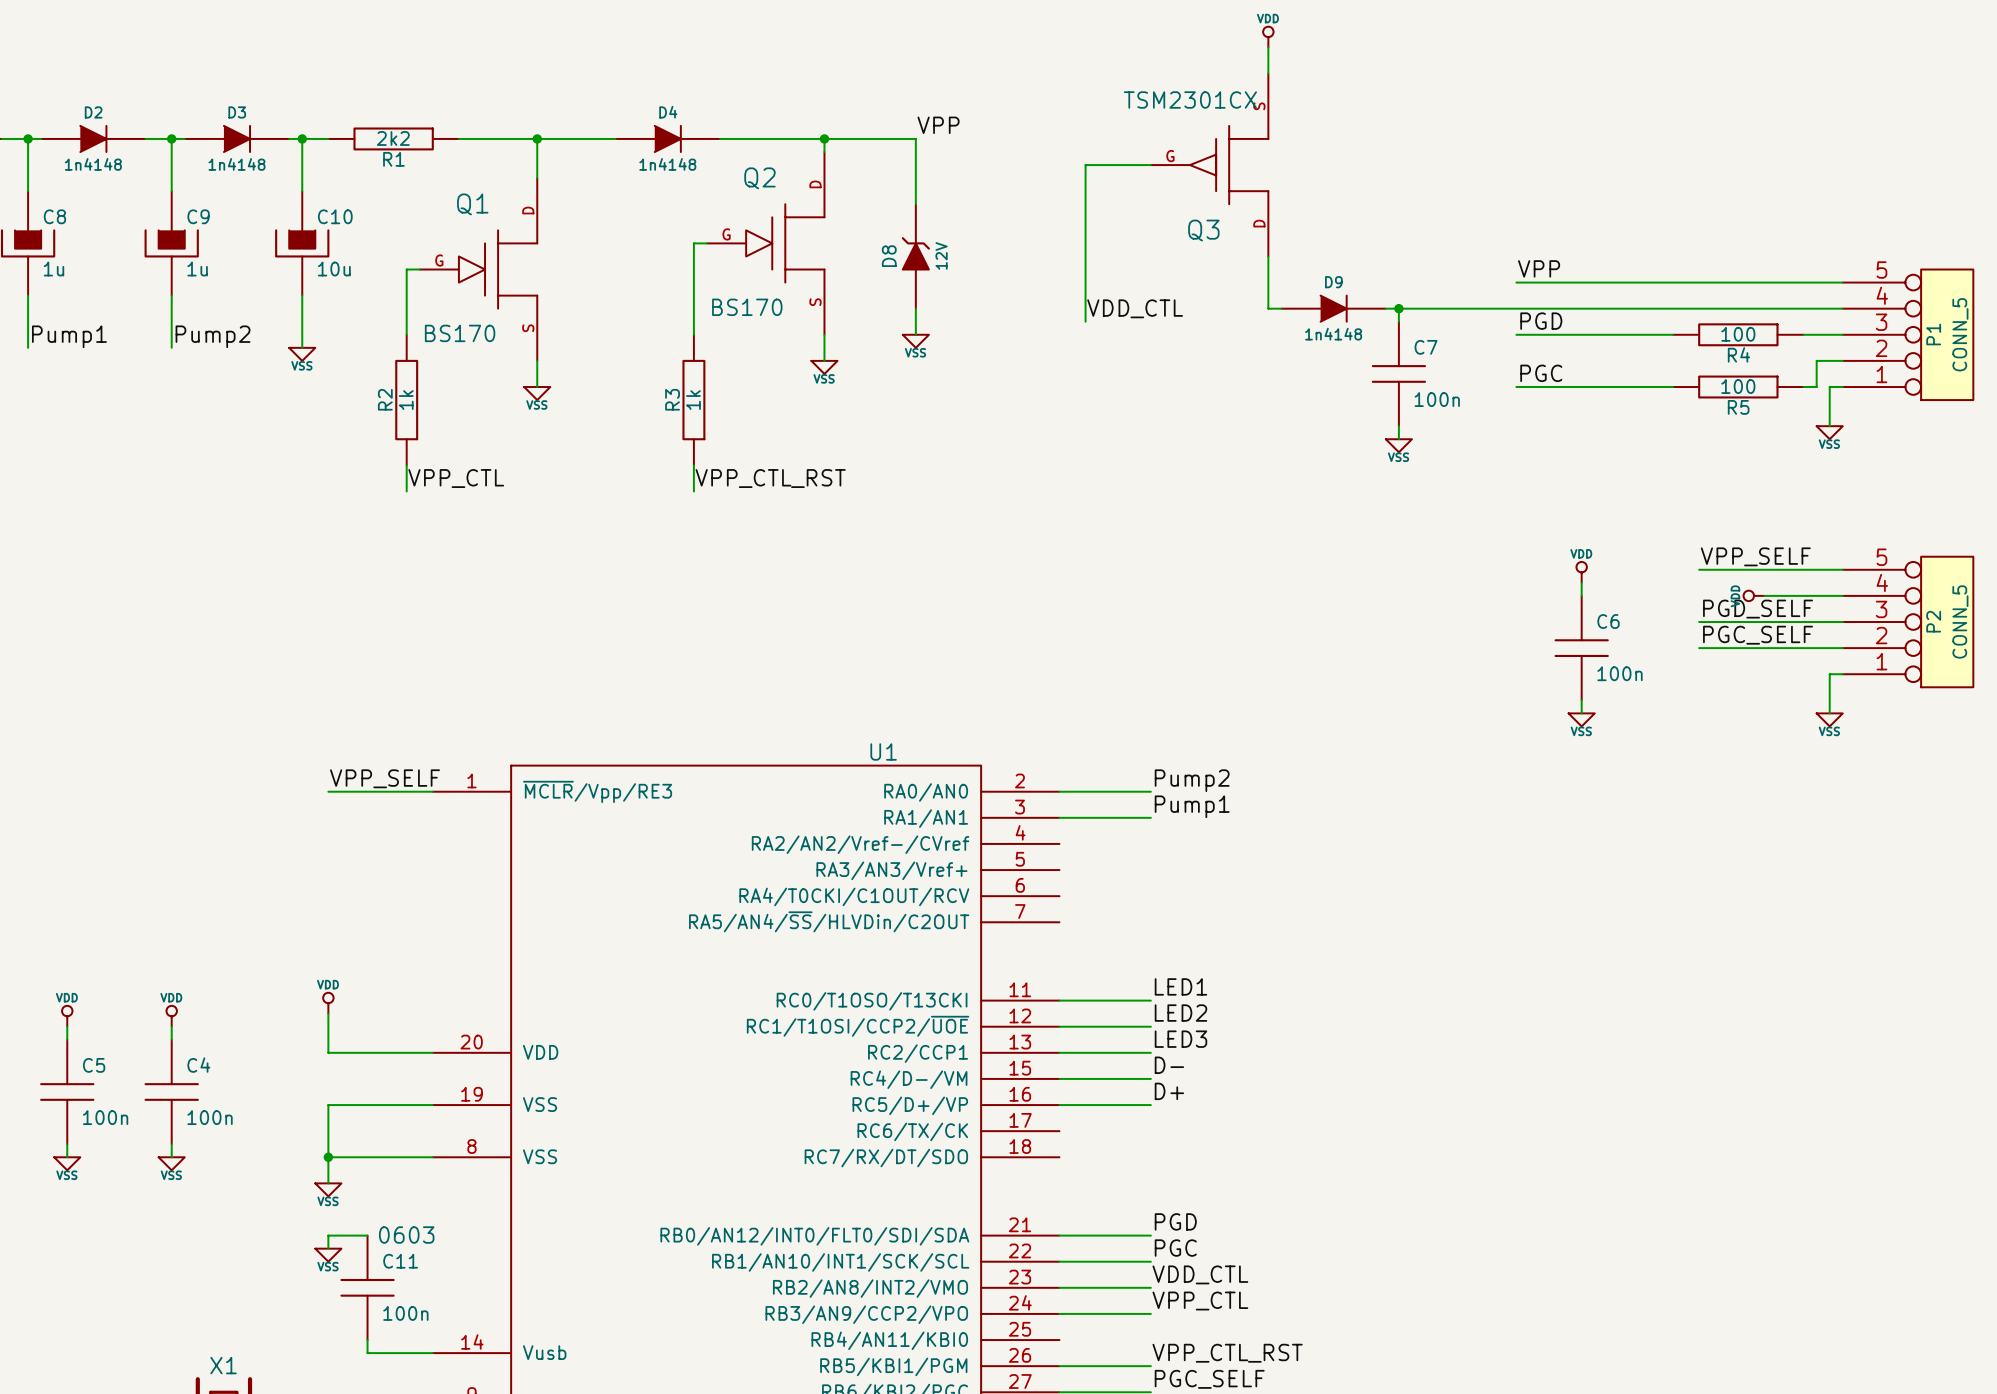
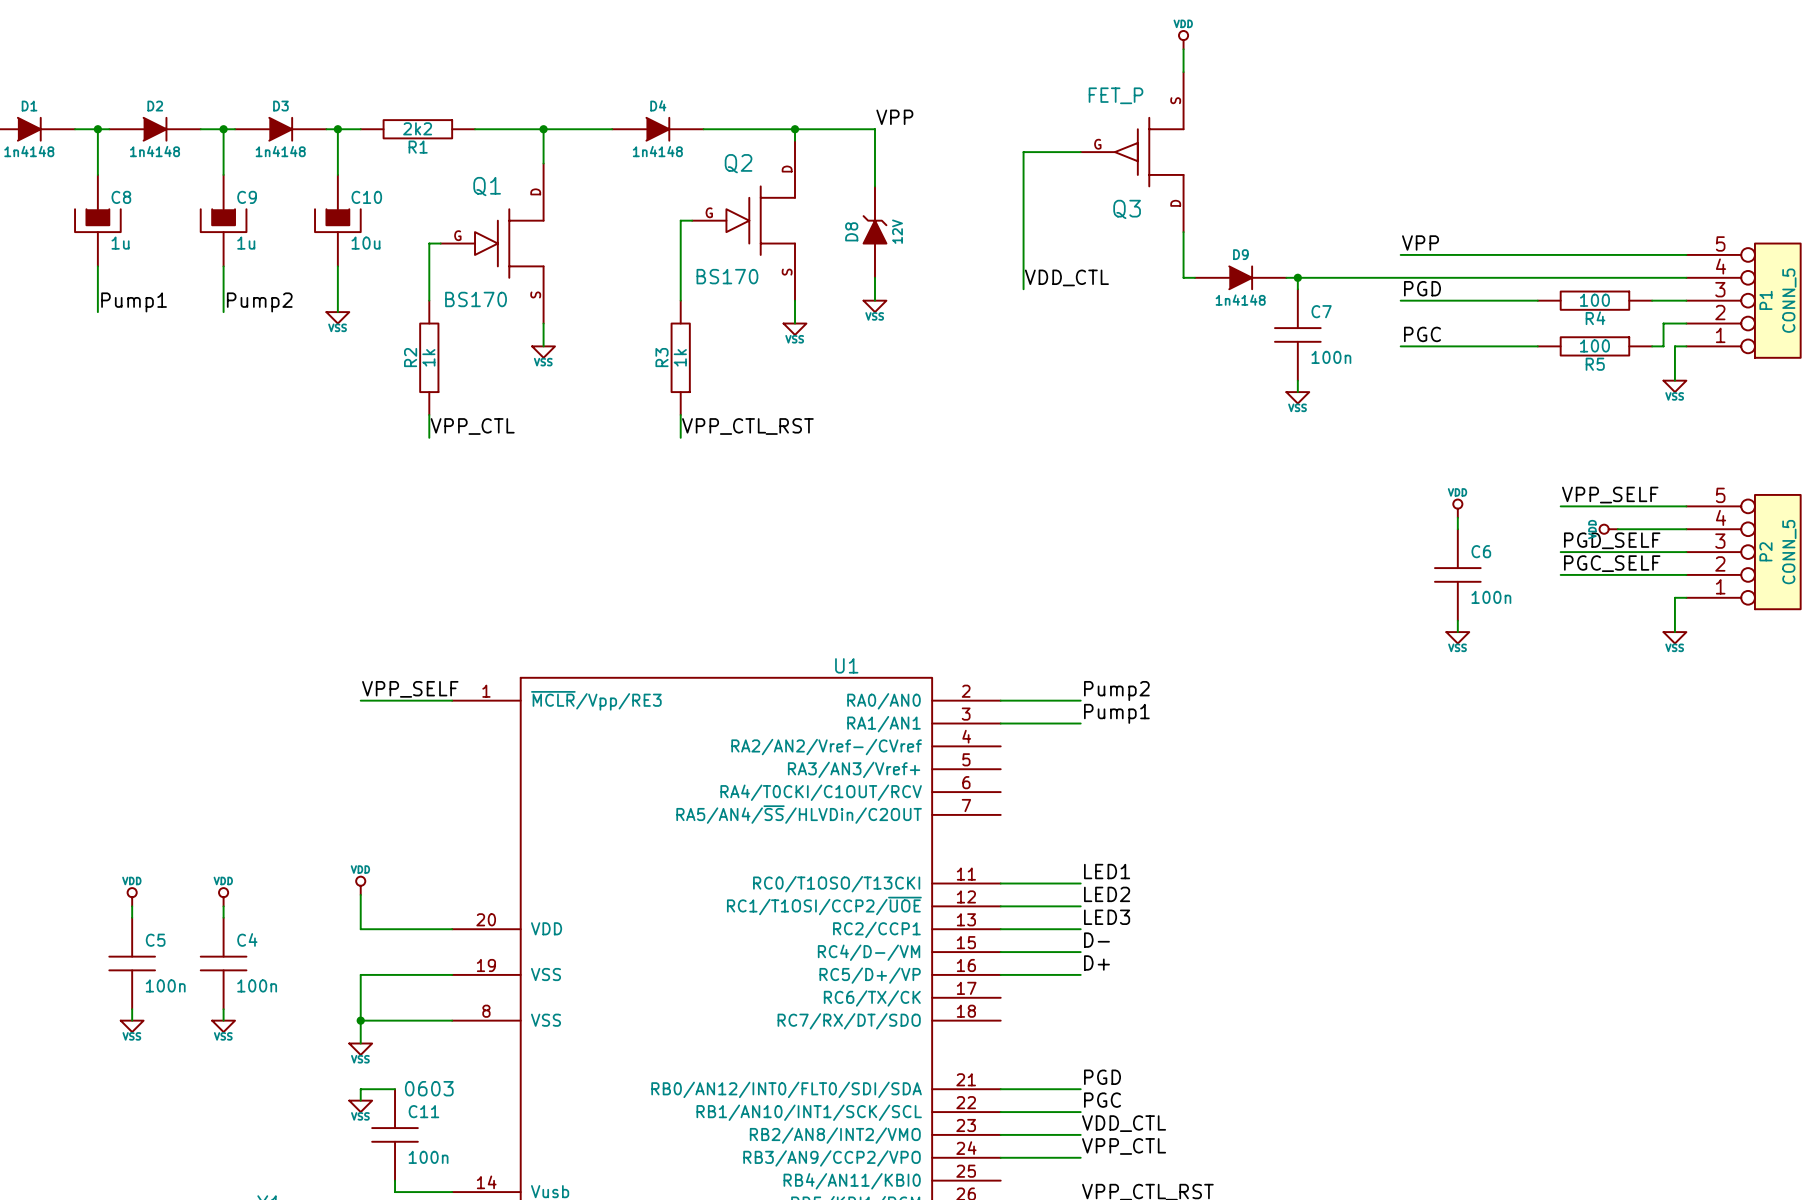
Q3 value: TSM2301CX (1190, 99) -> FET_P (1116, 95)

